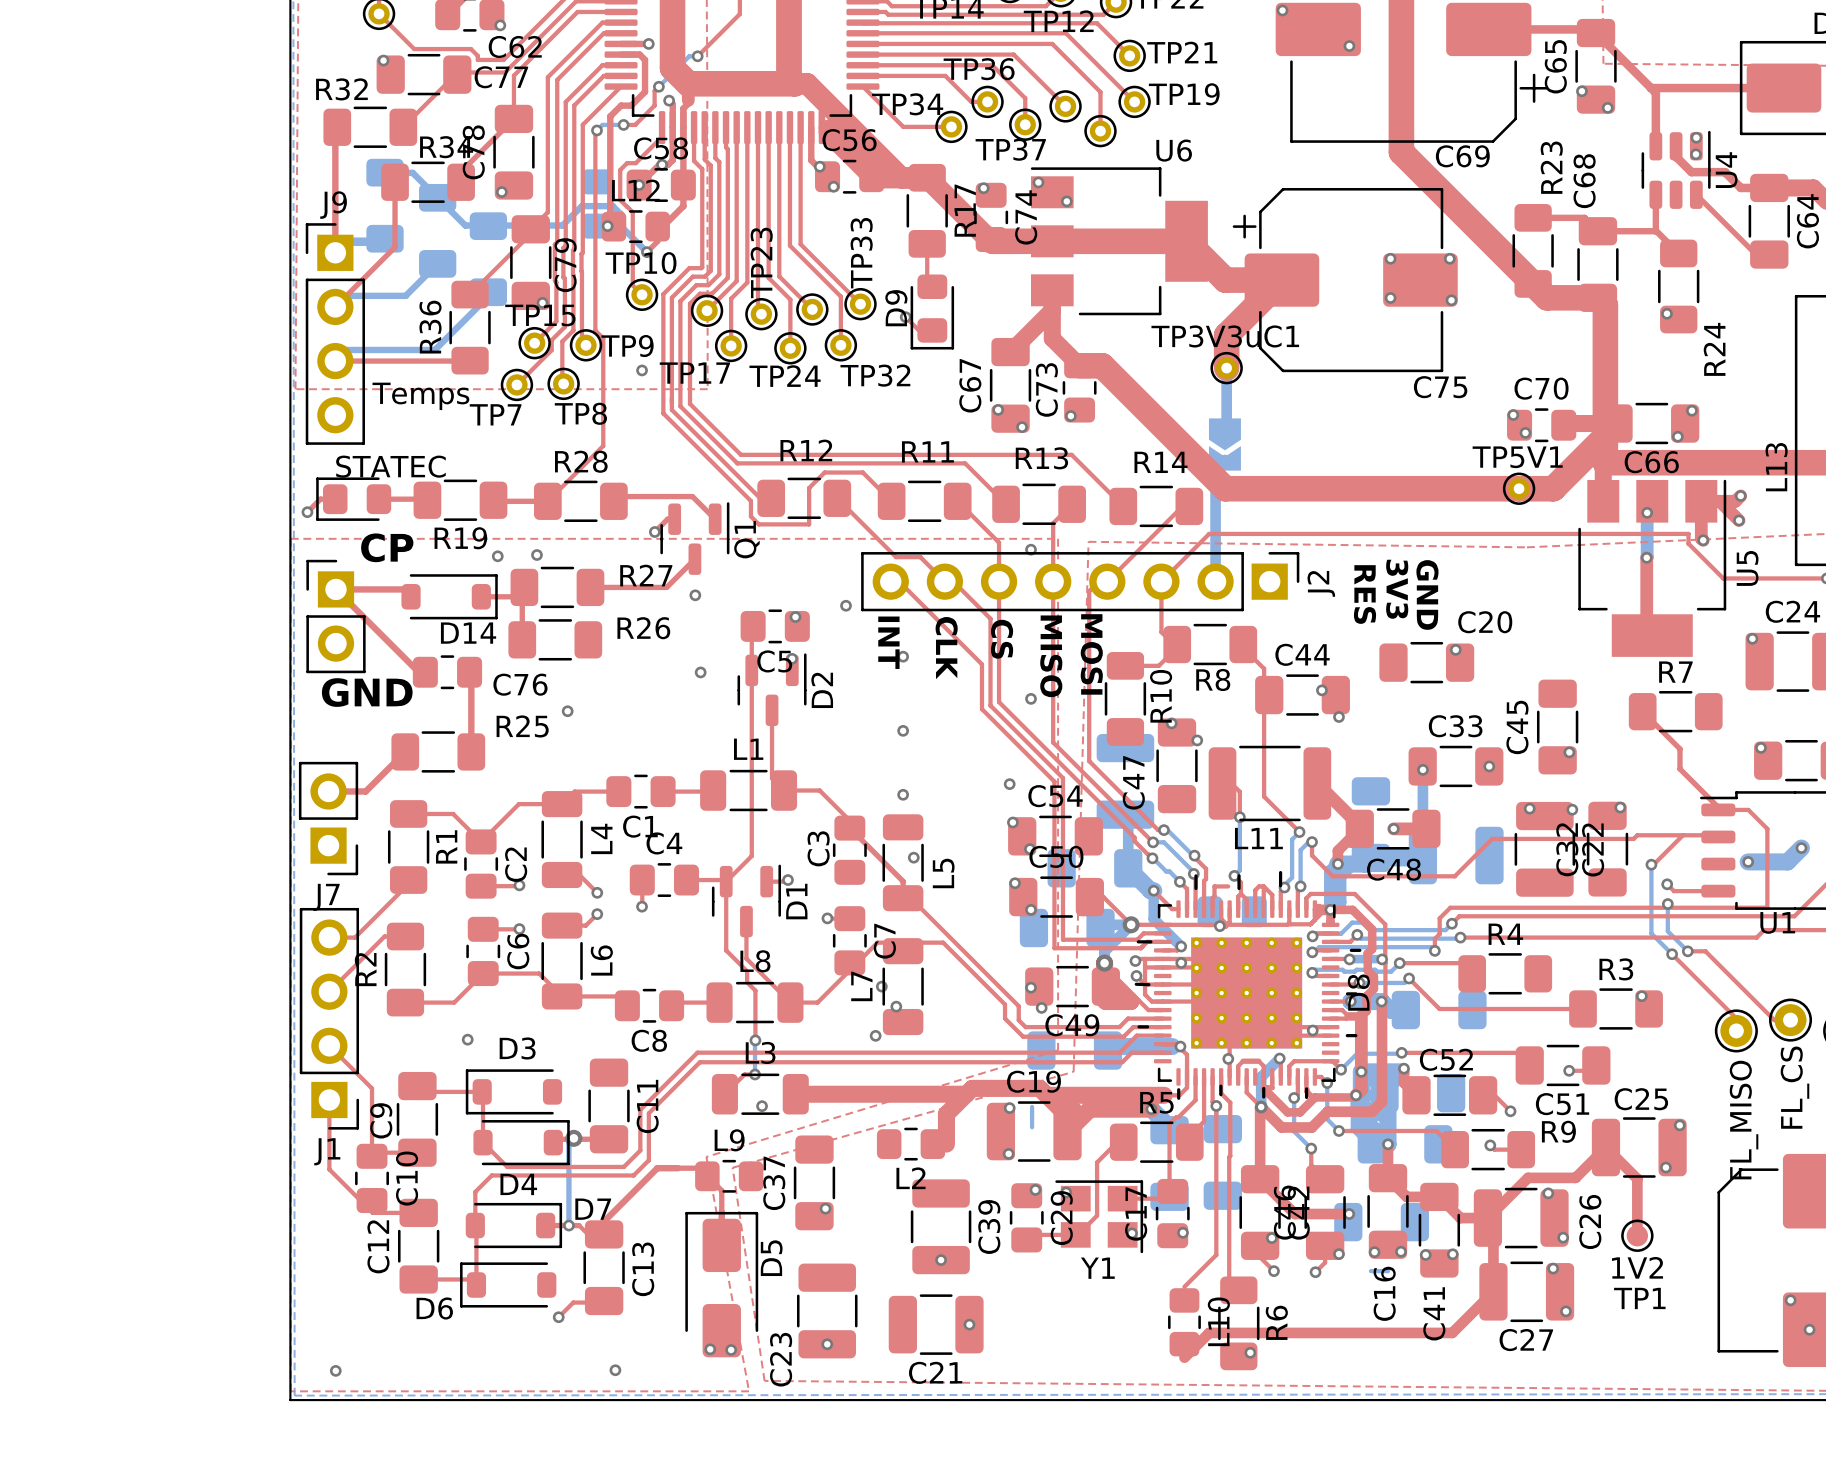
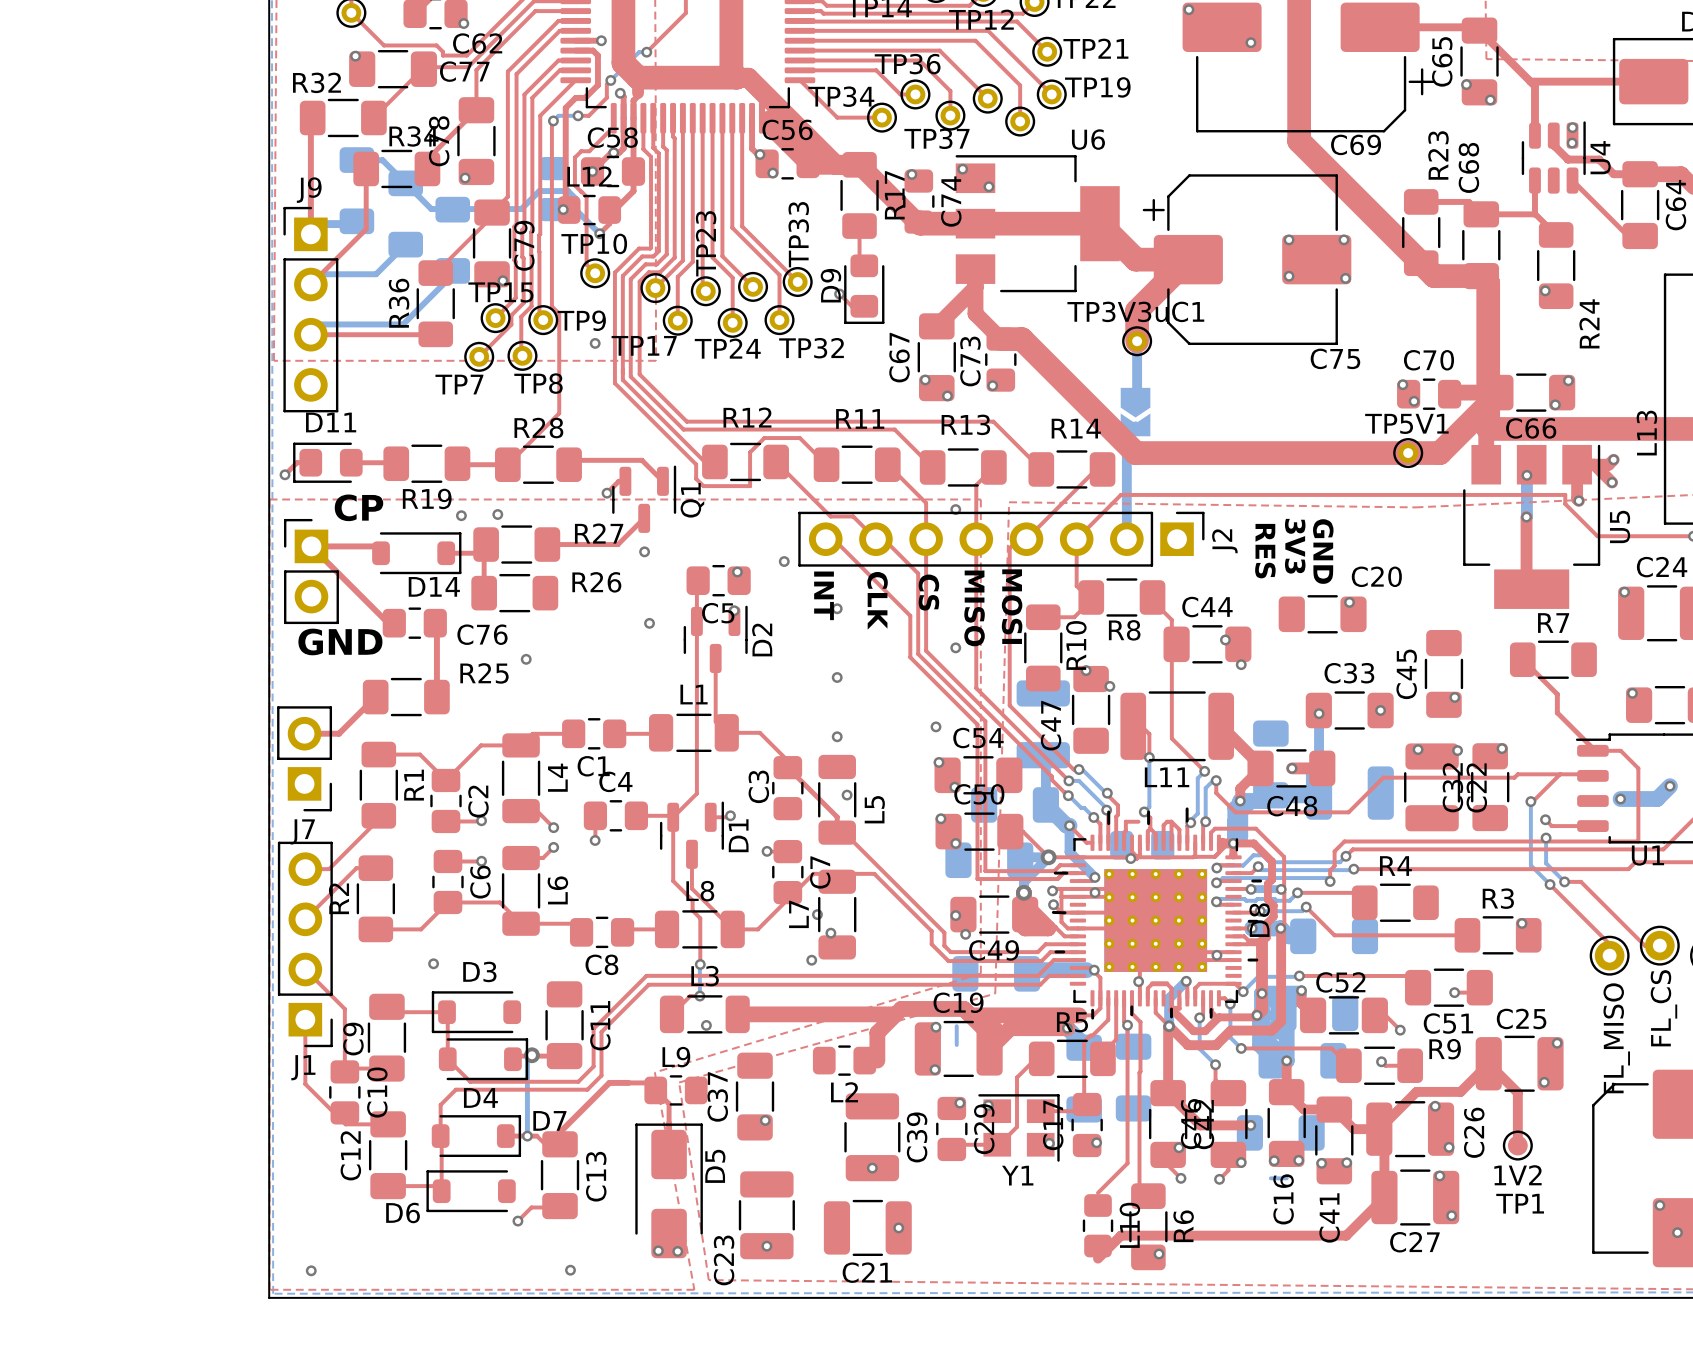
J9 value: Temps (420, 396) -> none
D11 name: none -> D11 (331, 422)
D11 value: STATEC (390, 466) -> none

